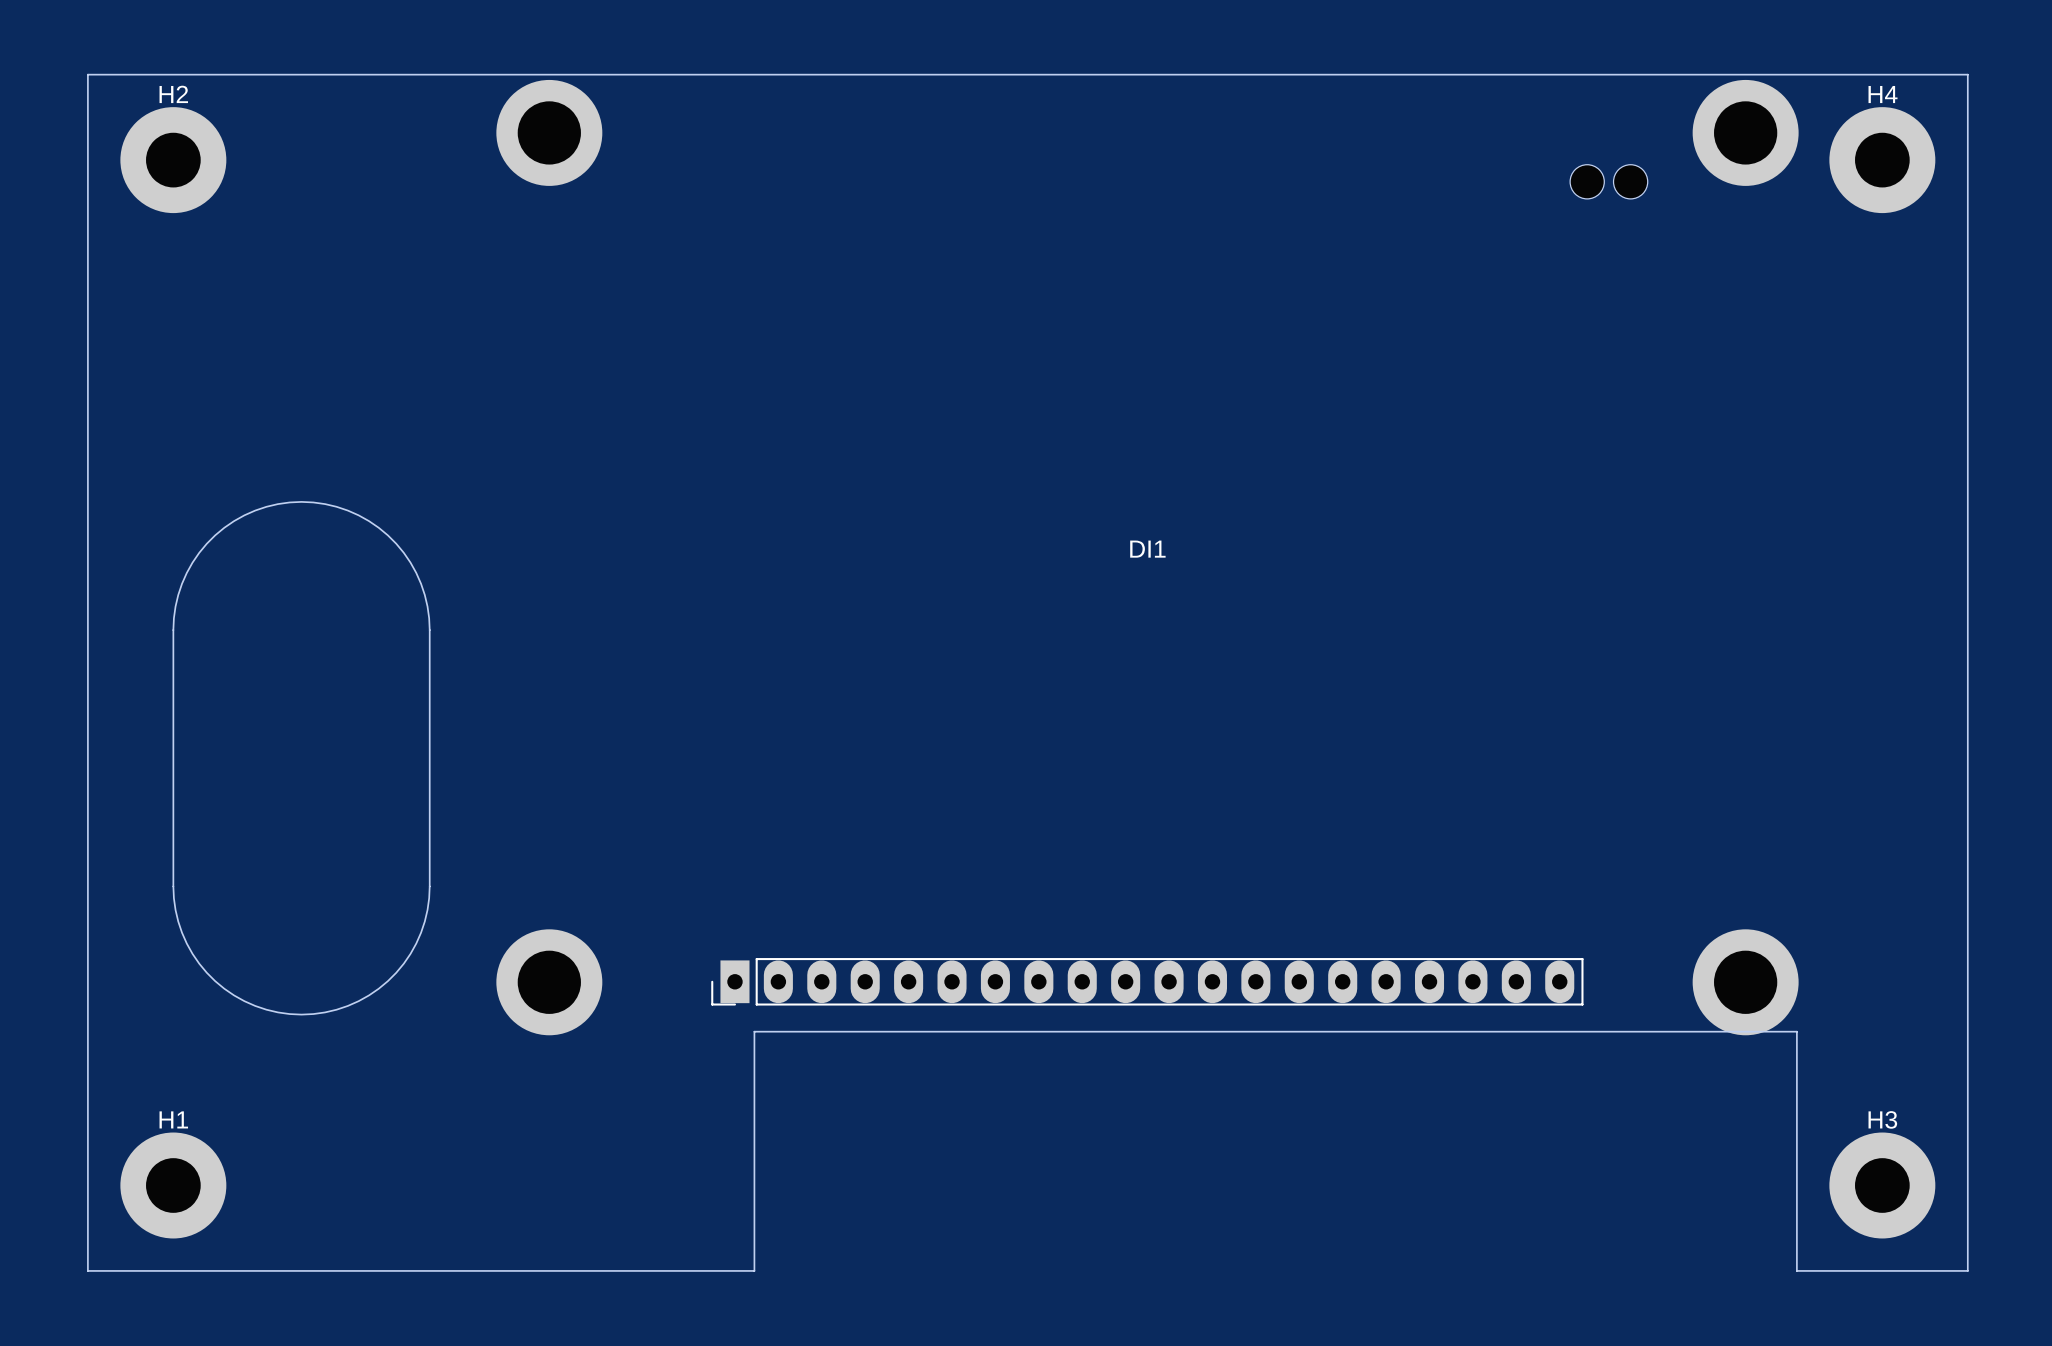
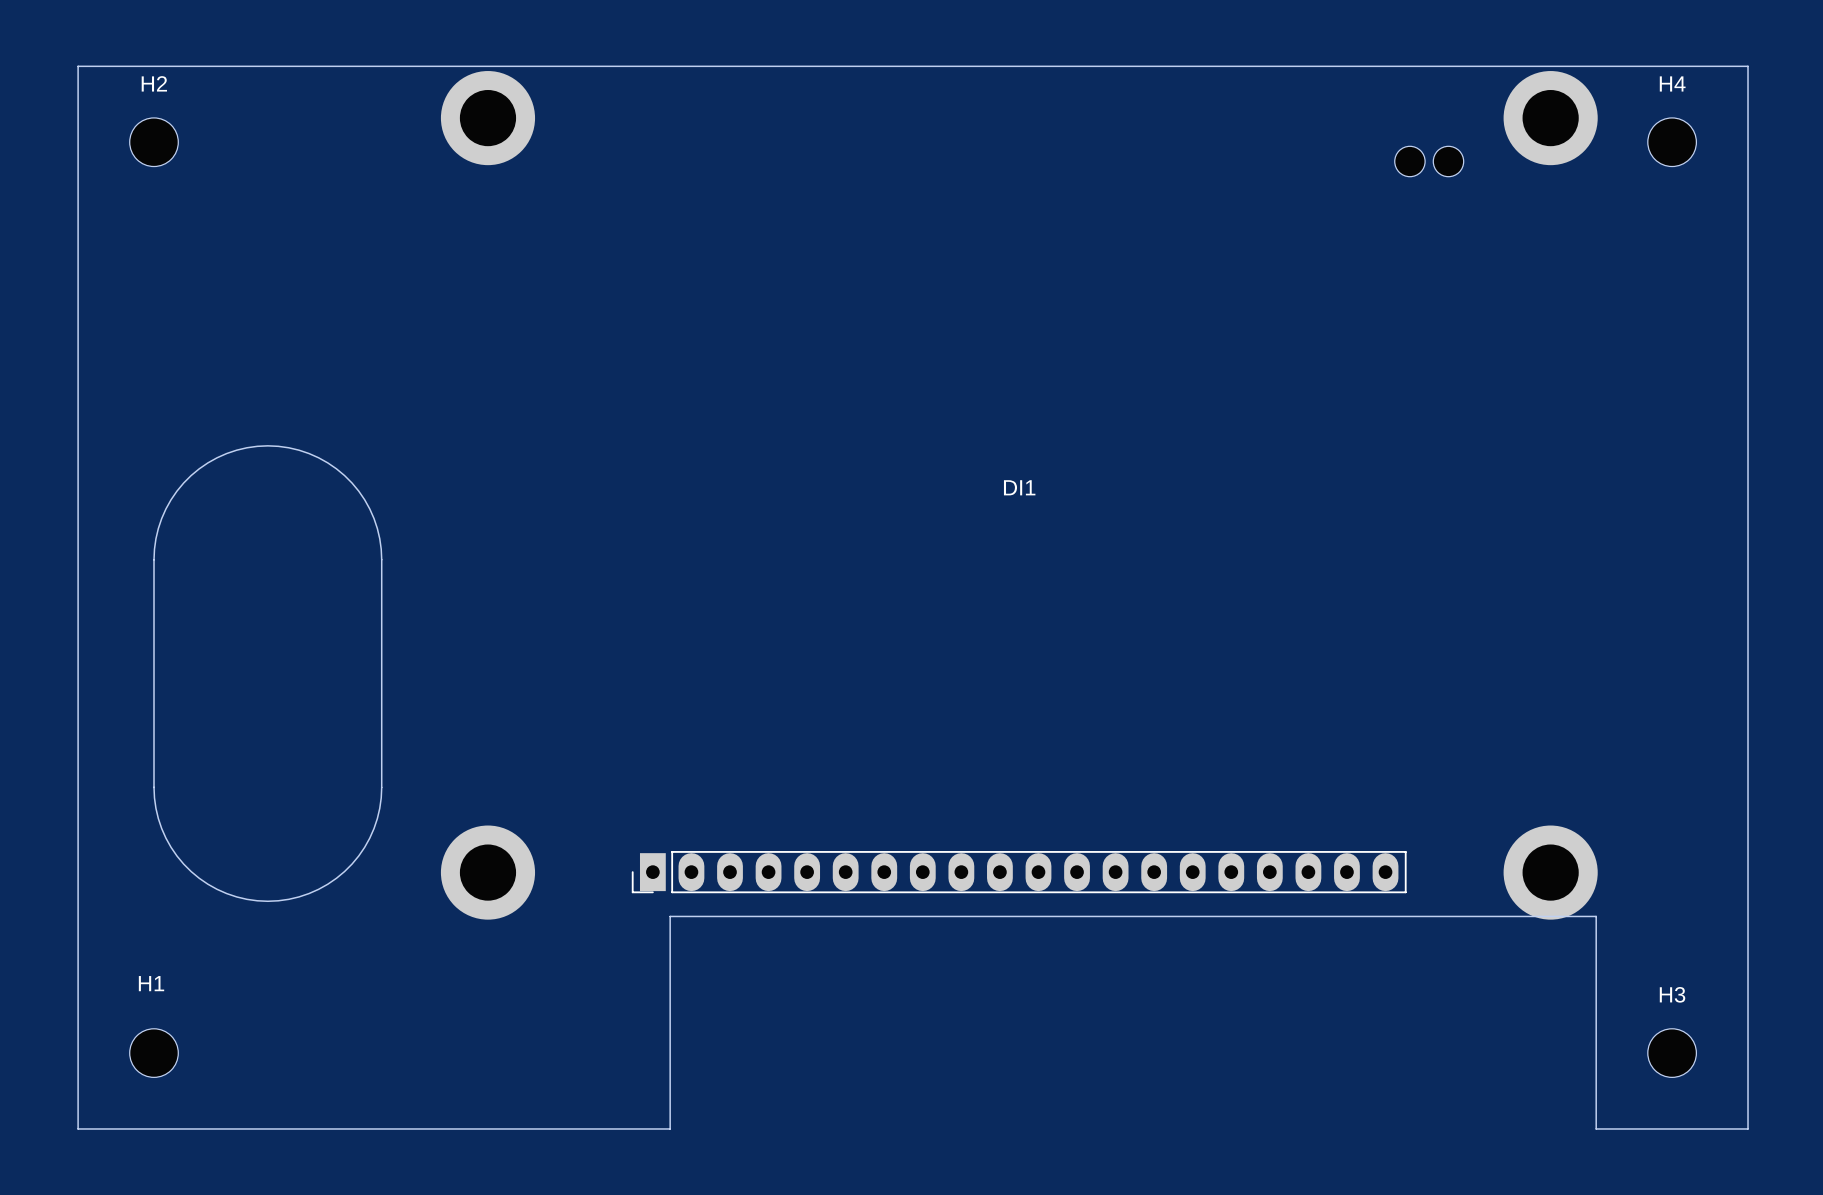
H2 footprint: [120, 107, 227, 214] -> [129, 117, 179, 167]
H4 footprint: [1829, 107, 1936, 214] -> [1647, 117, 1697, 167]
H1 footprint: [120, 1132, 227, 1239] -> [129, 1028, 179, 1078]
H3 footprint: [1829, 1132, 1936, 1239] -> [1647, 1028, 1697, 1078]

